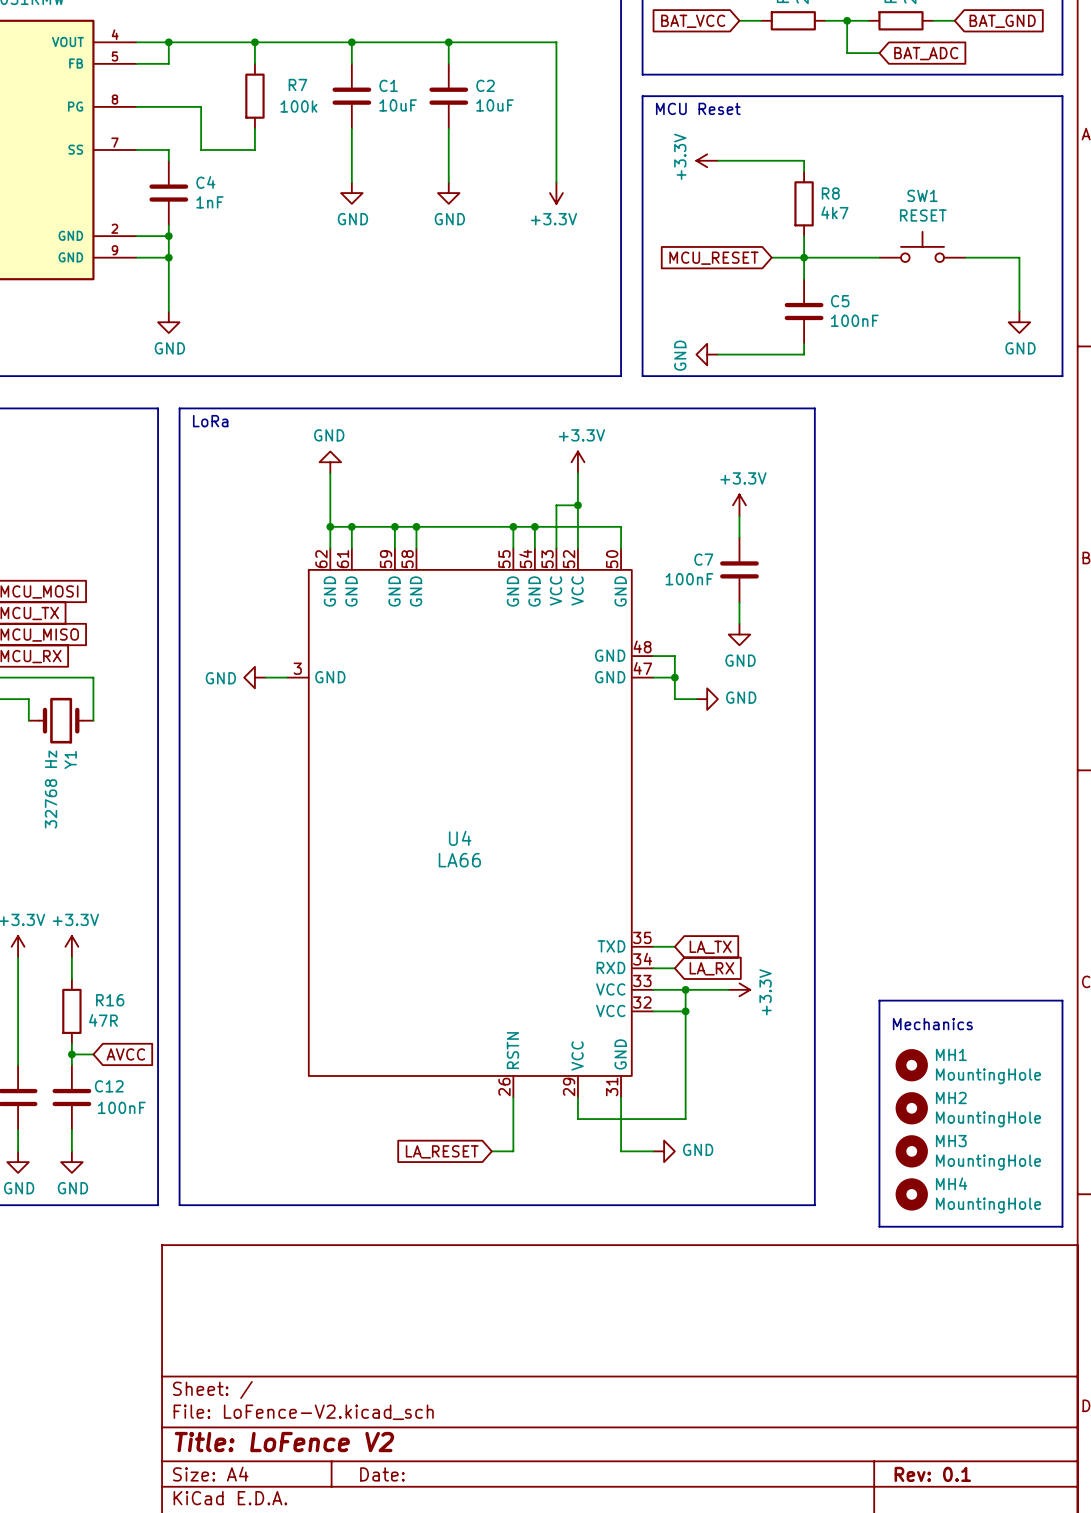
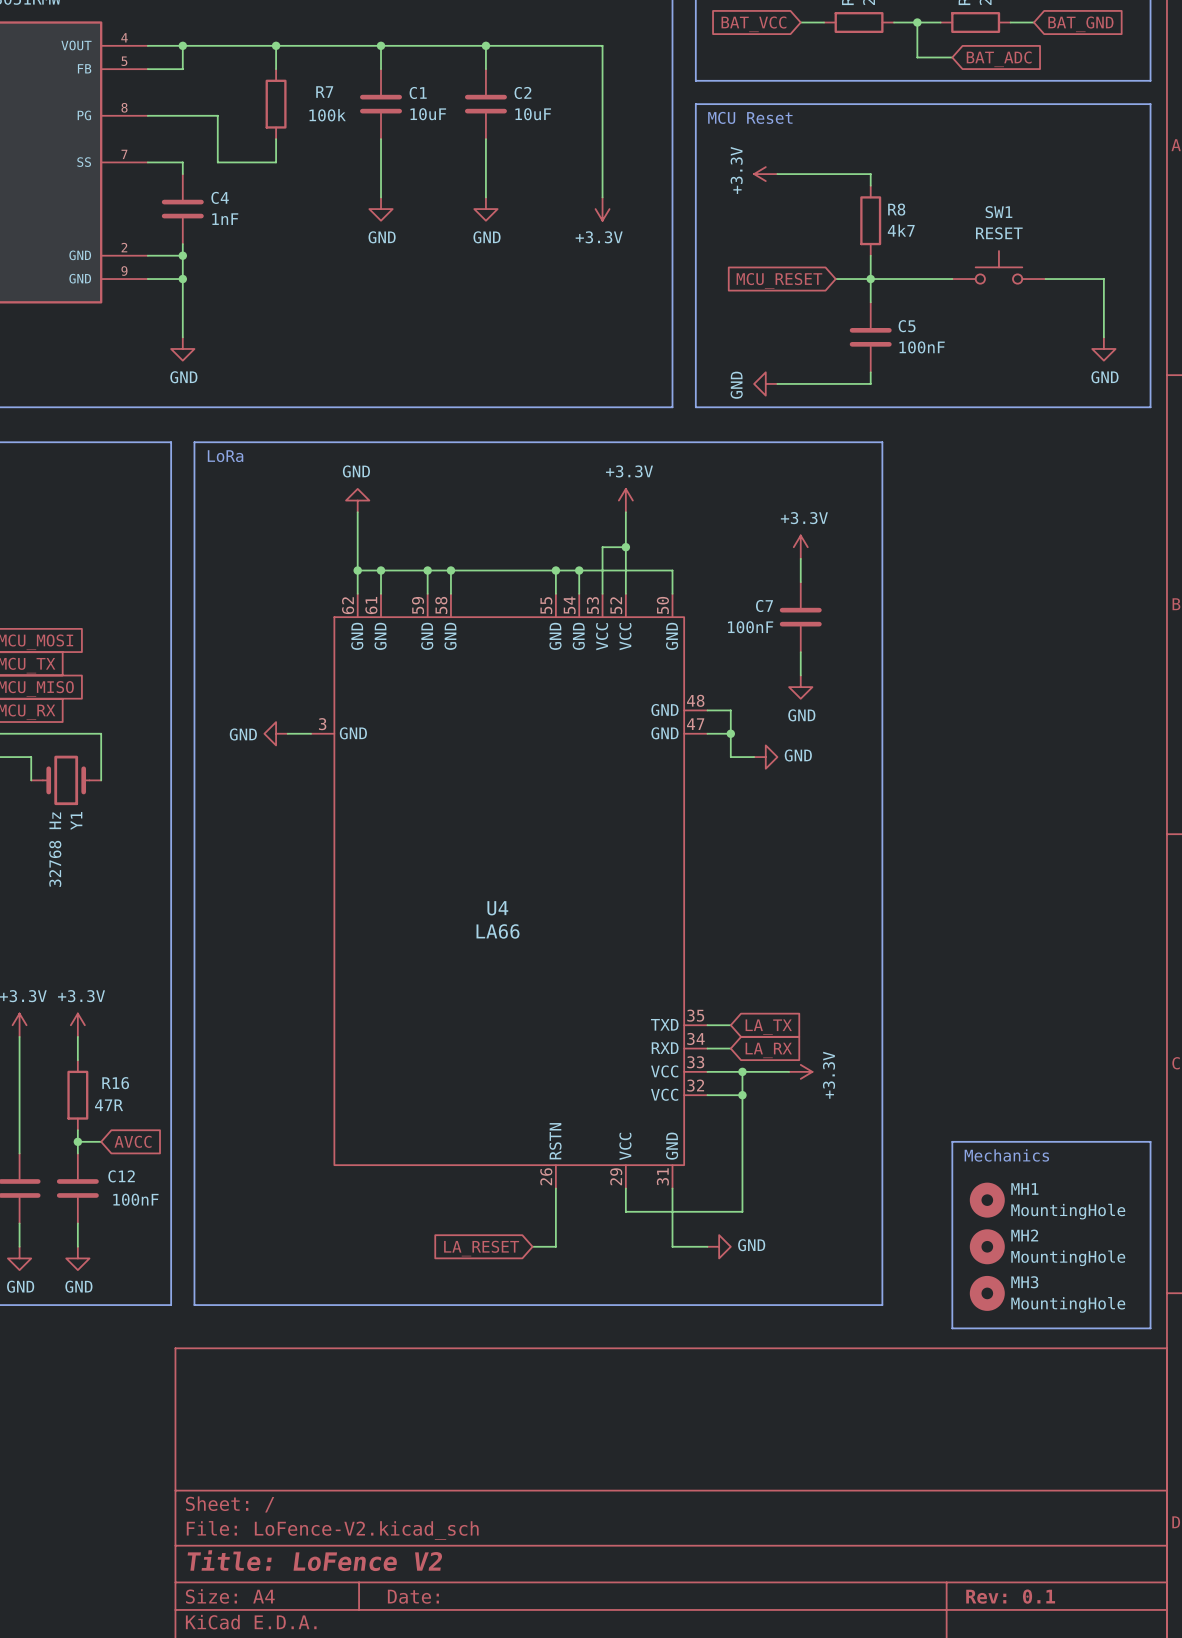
text position: Mechanics (932, 1024) -> Mechanics (1006, 1155)
line: (879, 1054) (879, 1000) (1062, 1000) (1062, 1054) -> (952, 1141) (1150, 1141)
MH1: MountingHole (911, 1065) -> none
MH2 name: MH2 (951, 1097) -> MH1 (1024, 1188)
MH3 name: MH3 (951, 1141) -> MH2 (1024, 1235)
MH4 name: MH4 (951, 1183) -> MH3 (1024, 1282)

